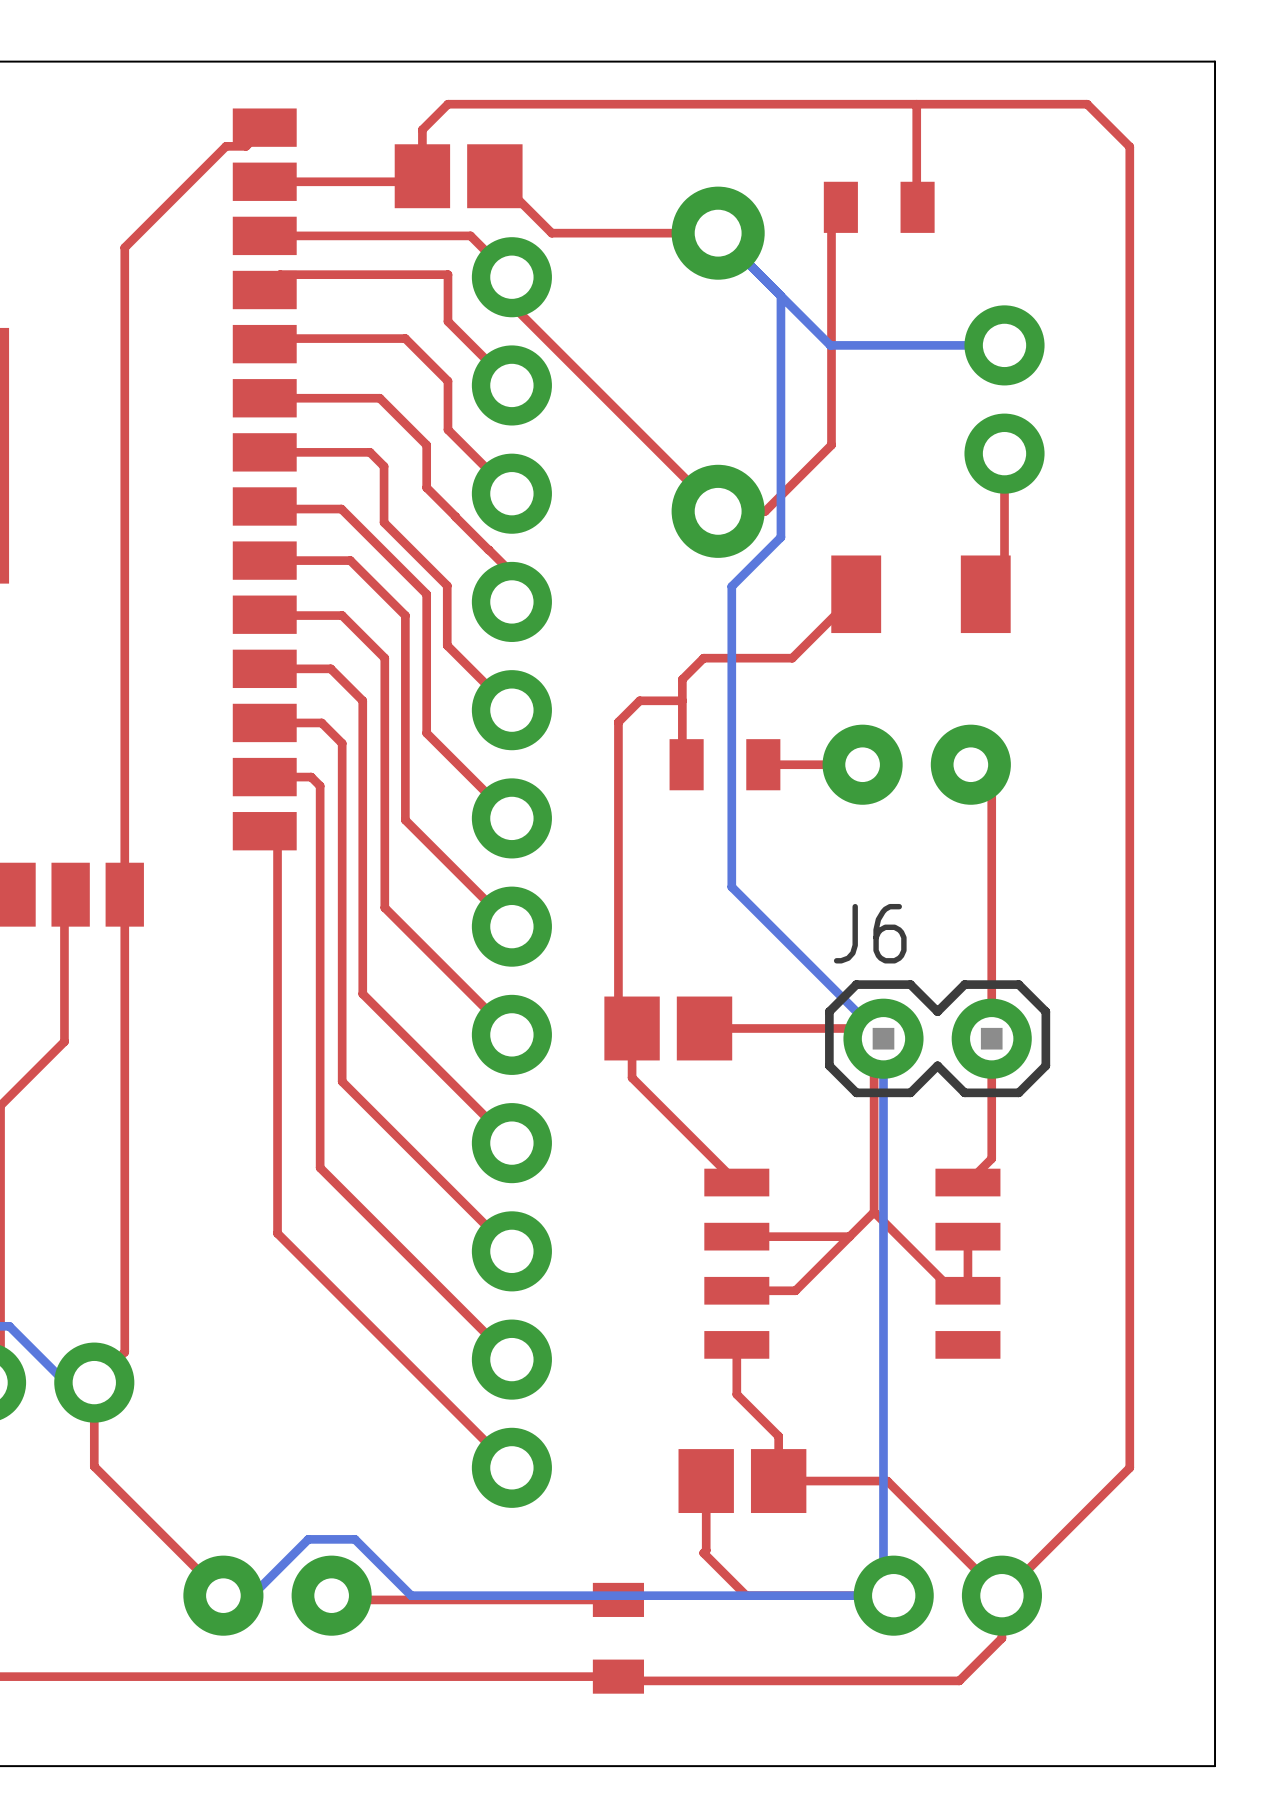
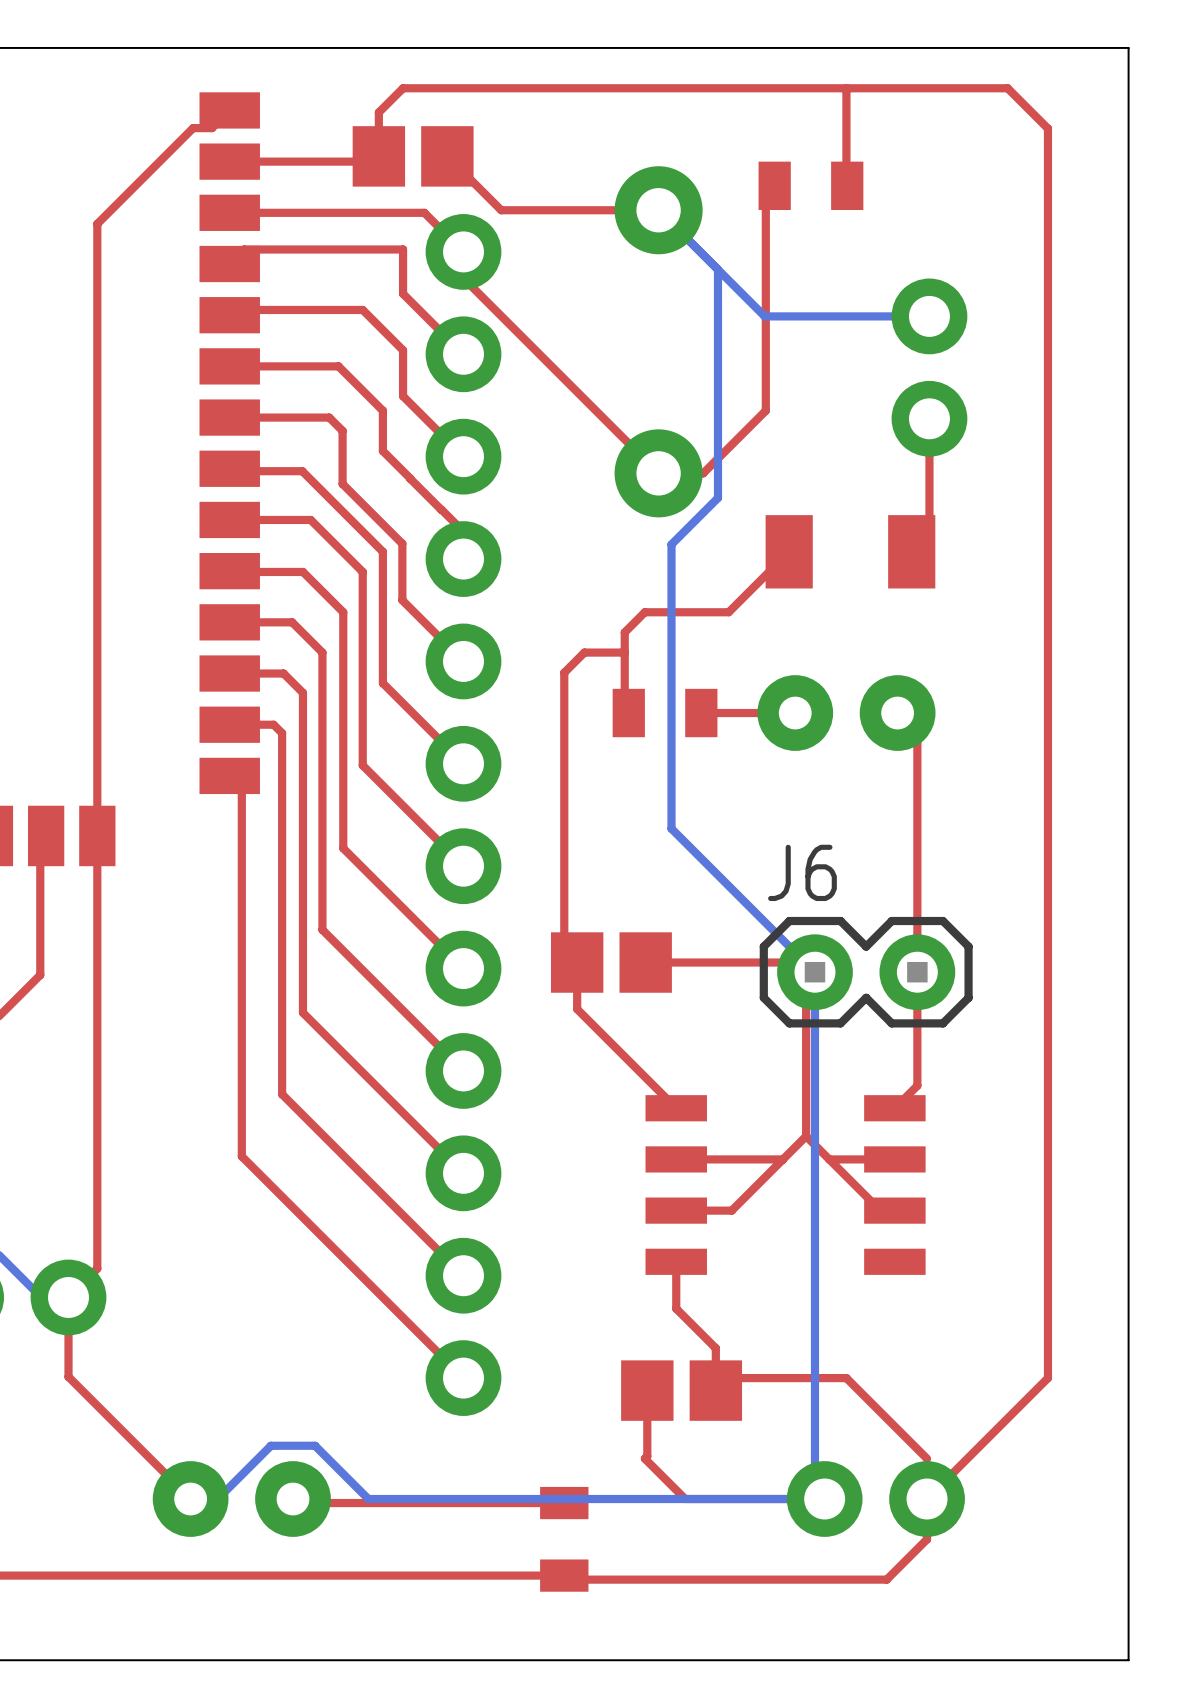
top track: (967, 1236) (967, 1290) -> (894, 1159) (829, 1159)
top track: (778, 1481) (887, 1481) (1001, 1595) -> (715, 1390) (728, 1378) (846, 1378) (927, 1458)

